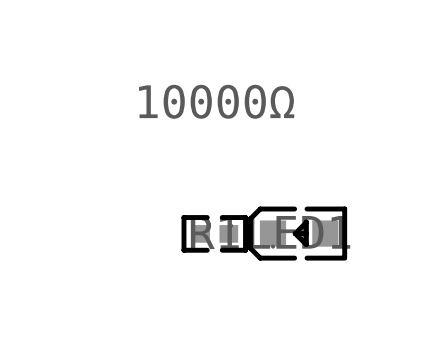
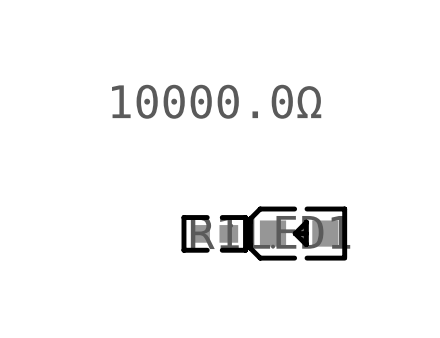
part value: 10000Ω (216, 101) -> 10000.0Ω (216, 101)

